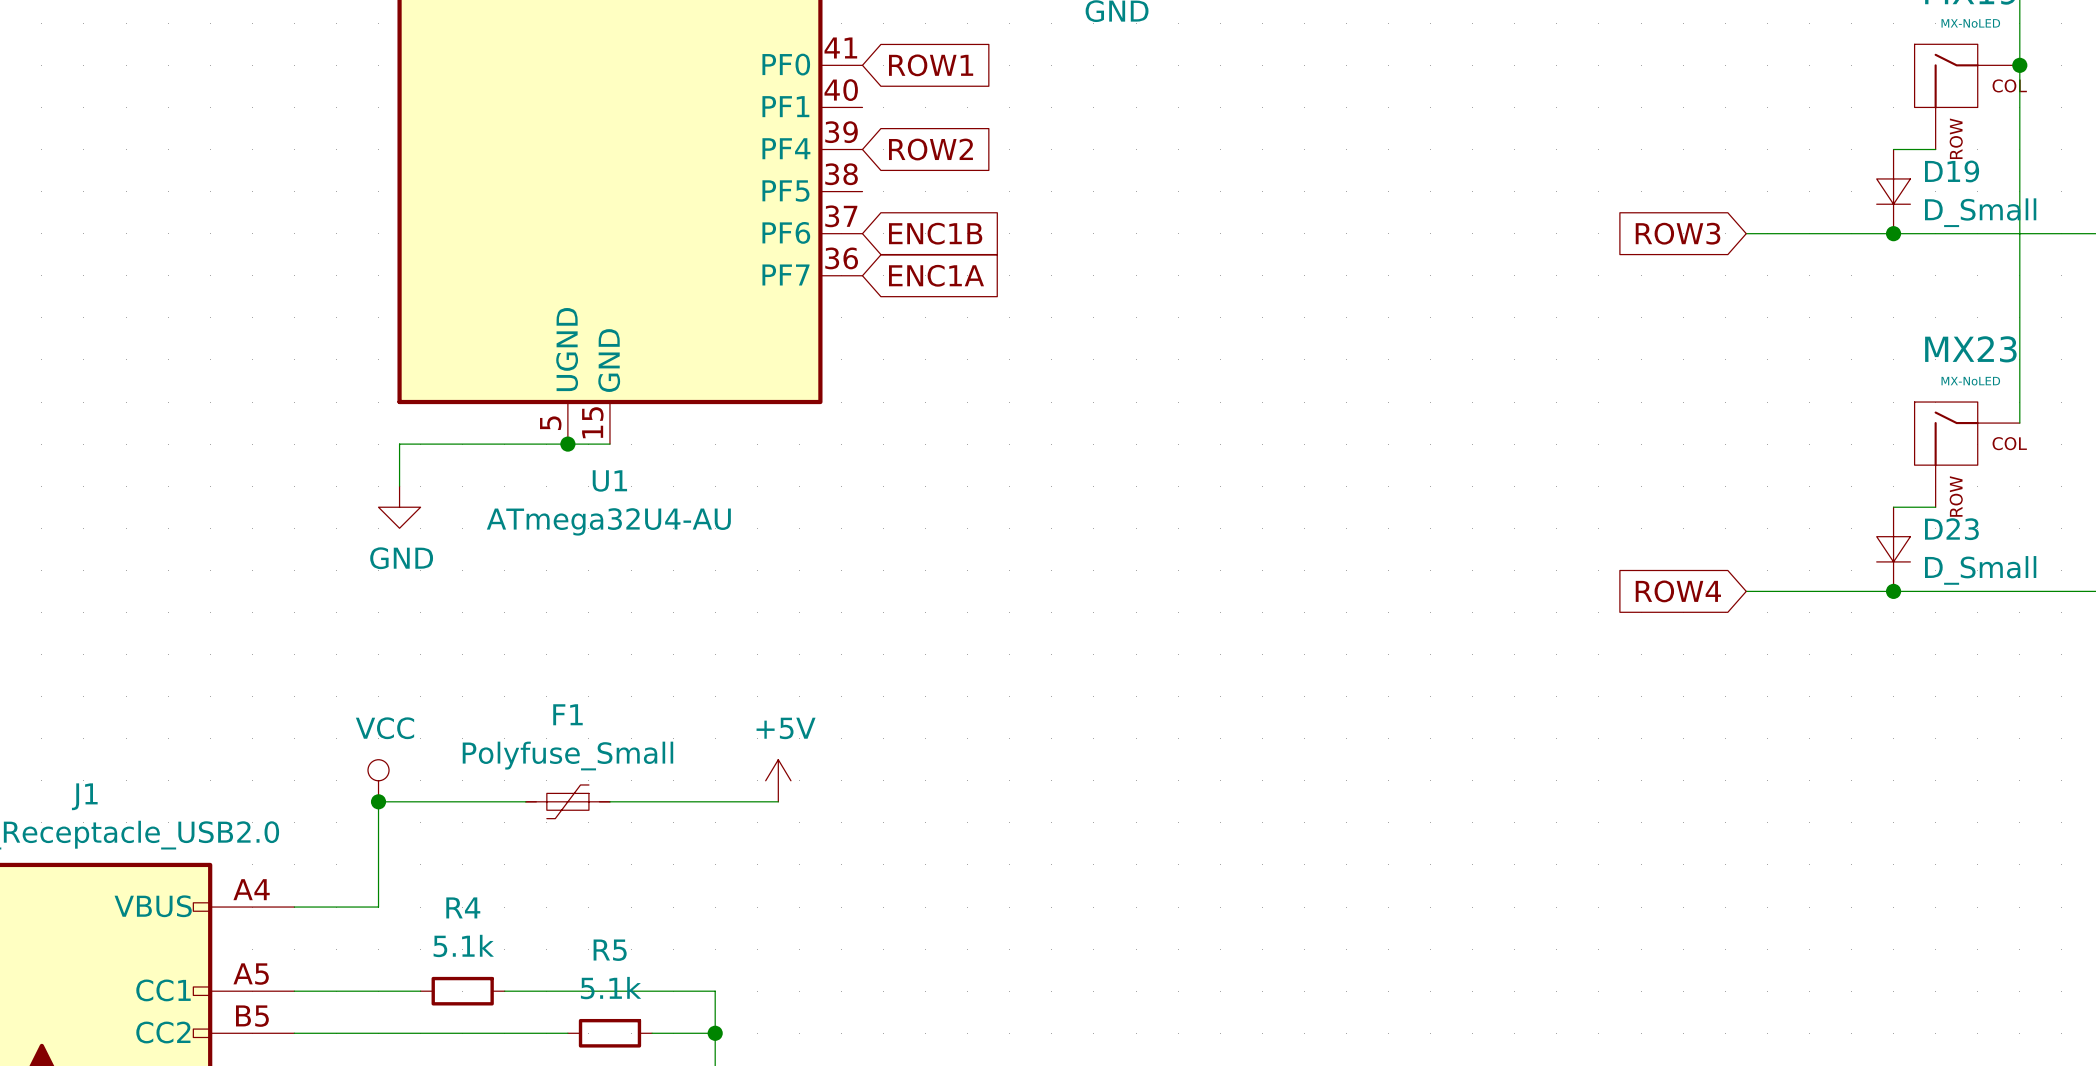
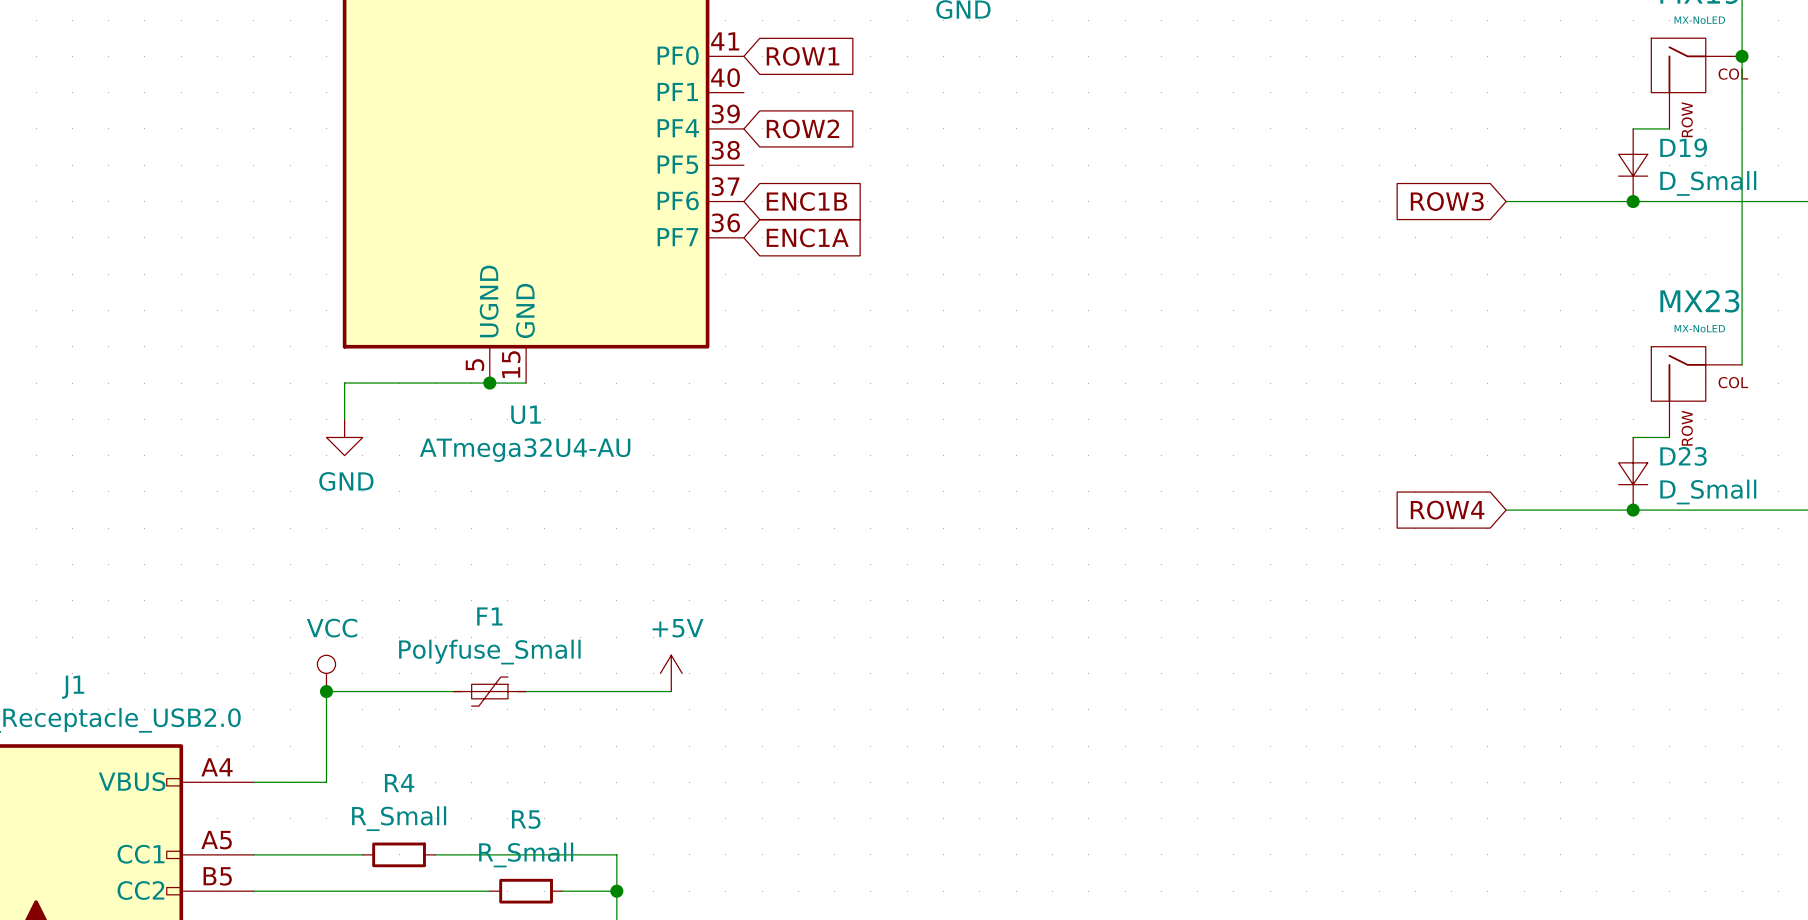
R4 value: 5.1k (463, 945) -> R_Small (399, 818)
R5 value: 5.1k (611, 988) -> R_Small (526, 854)

